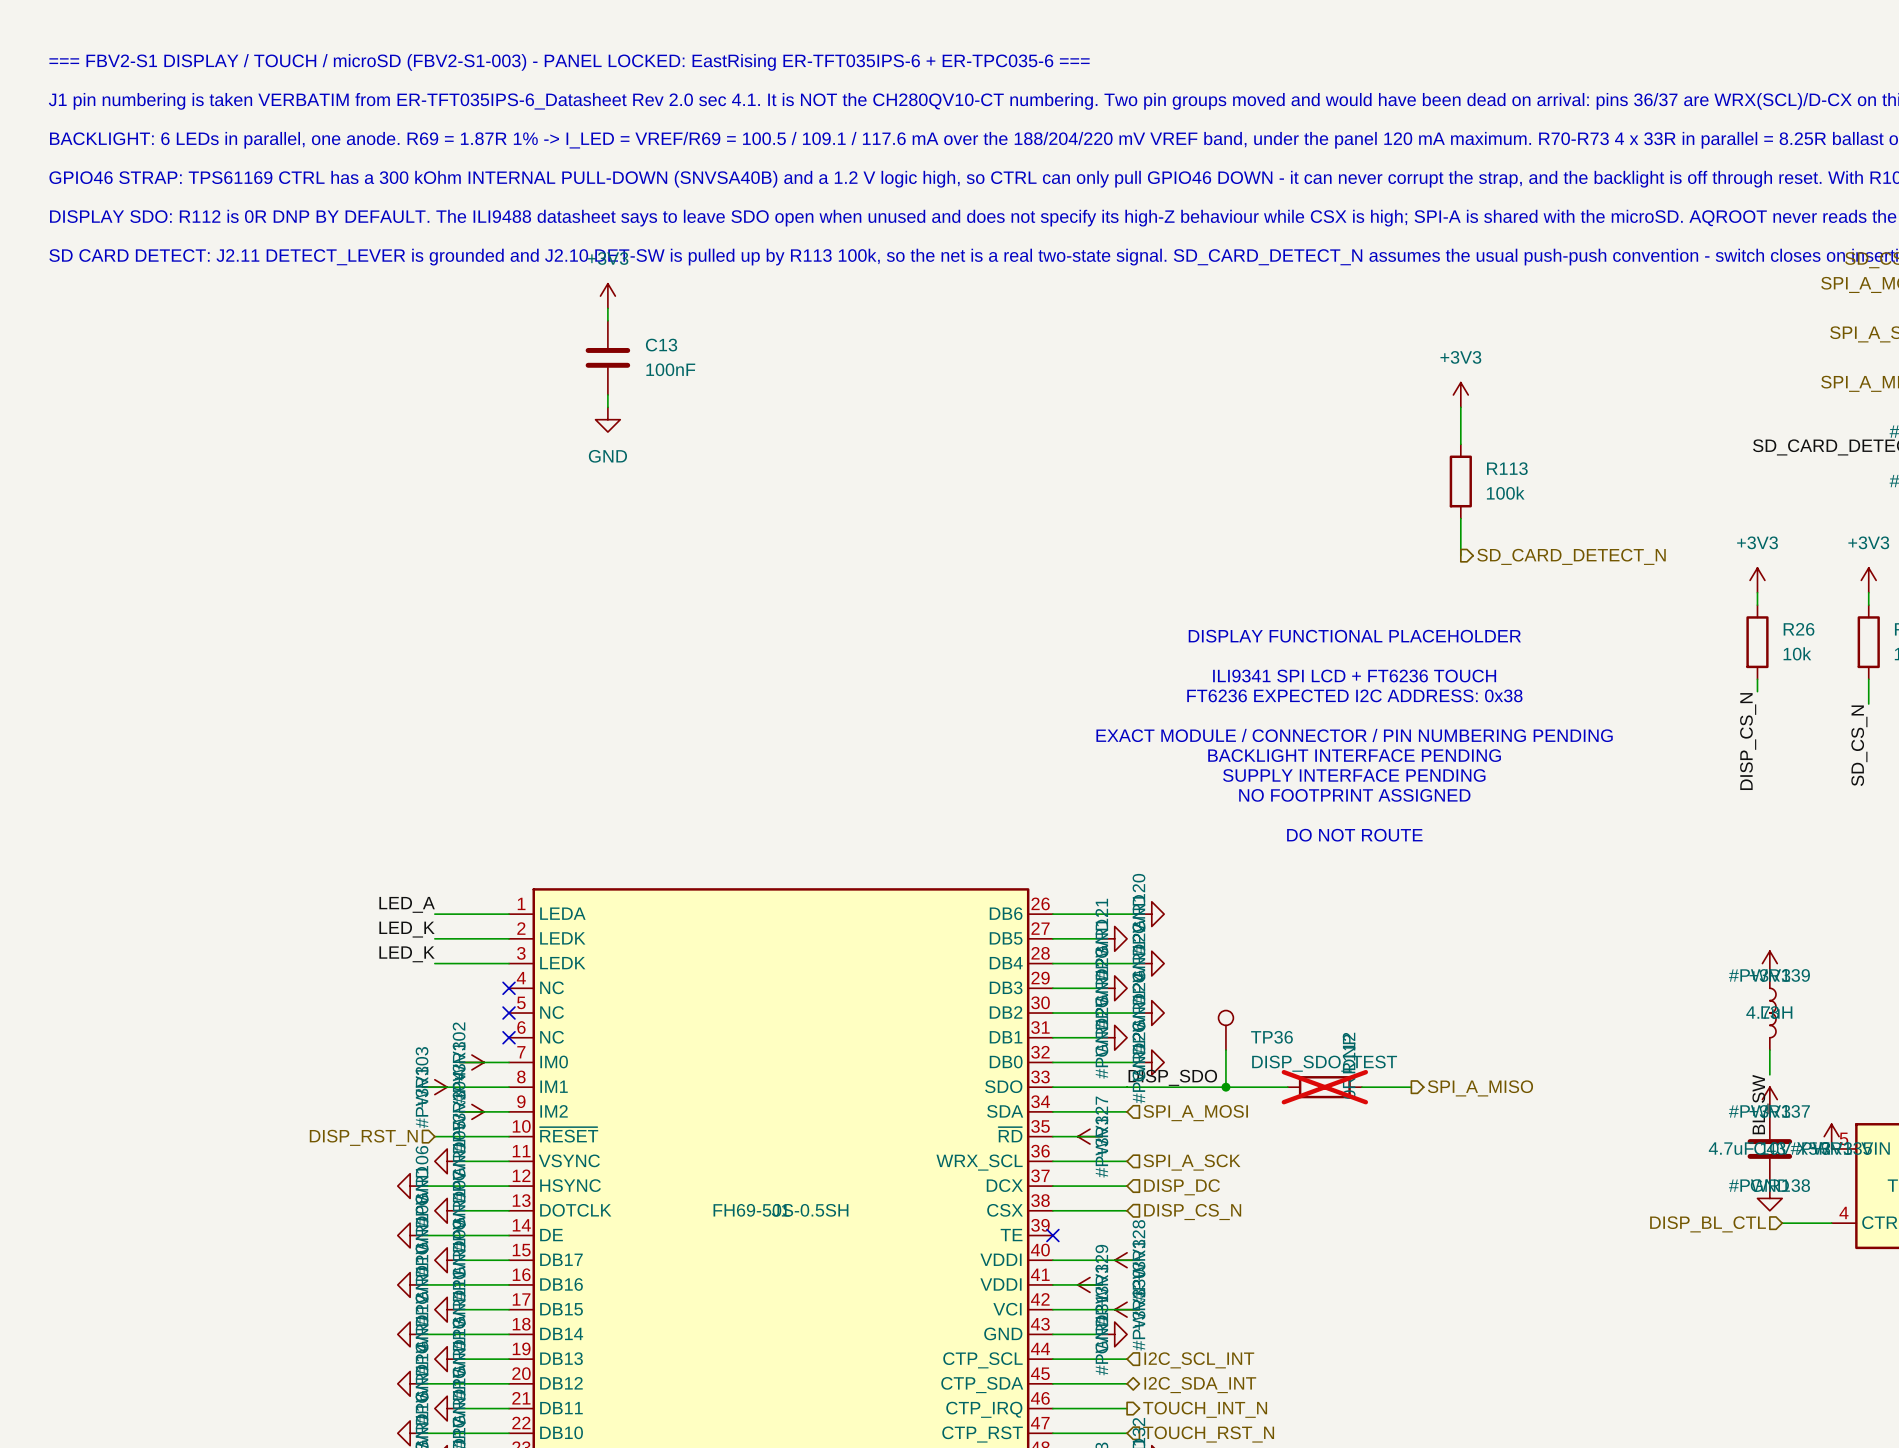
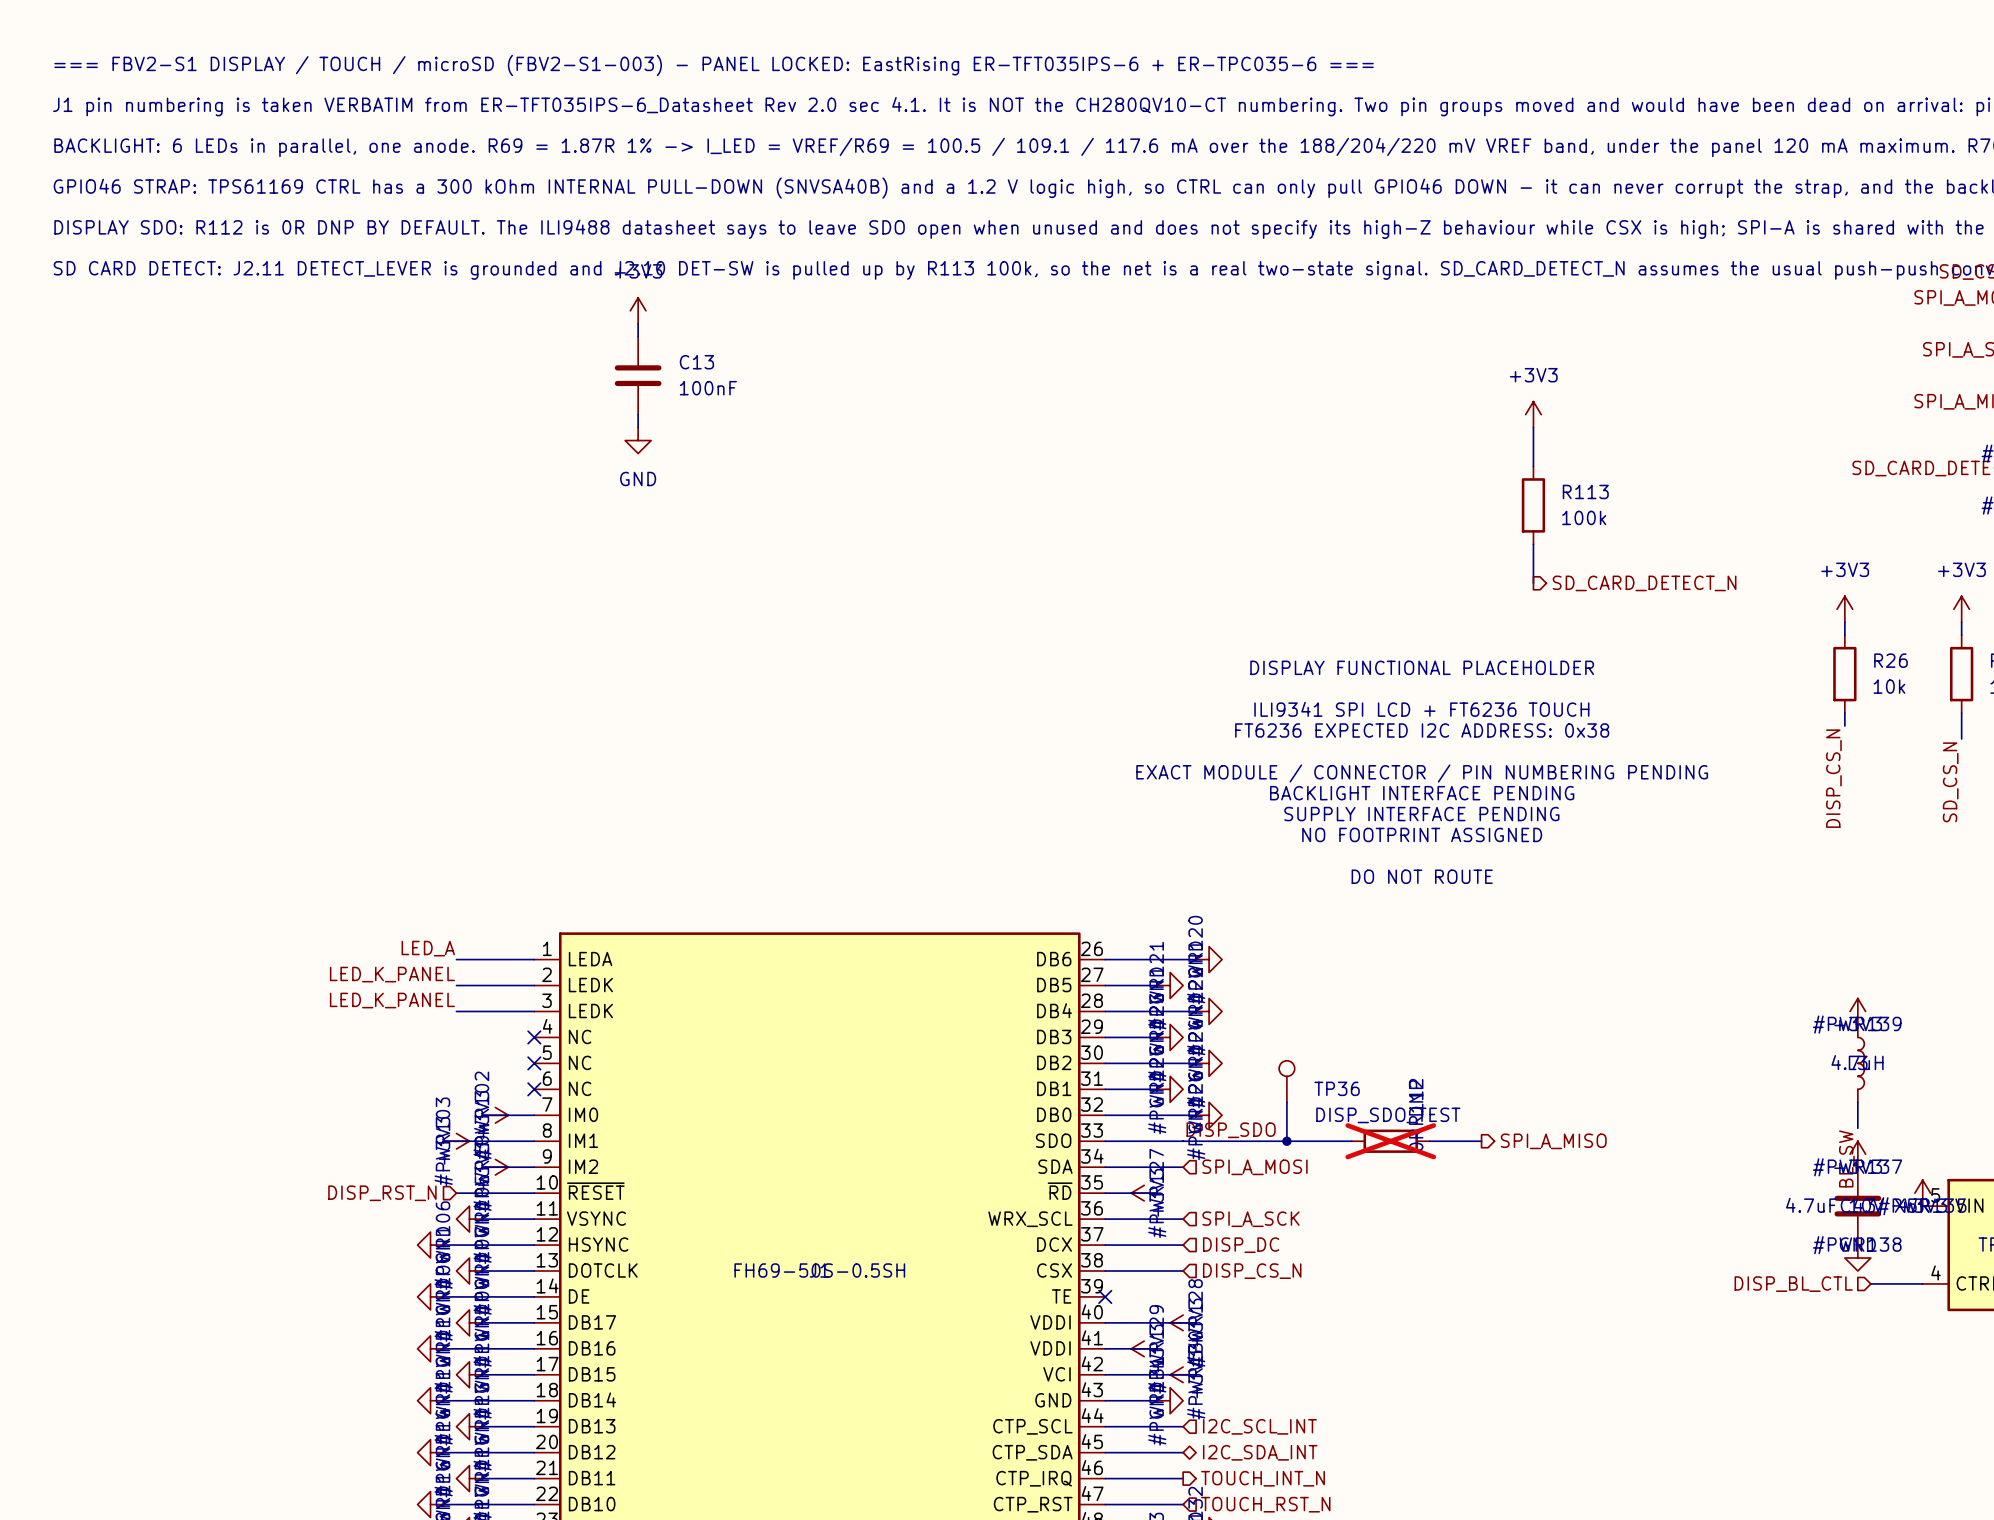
label: LED_K (407, 929) -> LED_K_PANEL (392, 974)
label: LED_K (407, 954) -> LED_K_PANEL (392, 1000)

